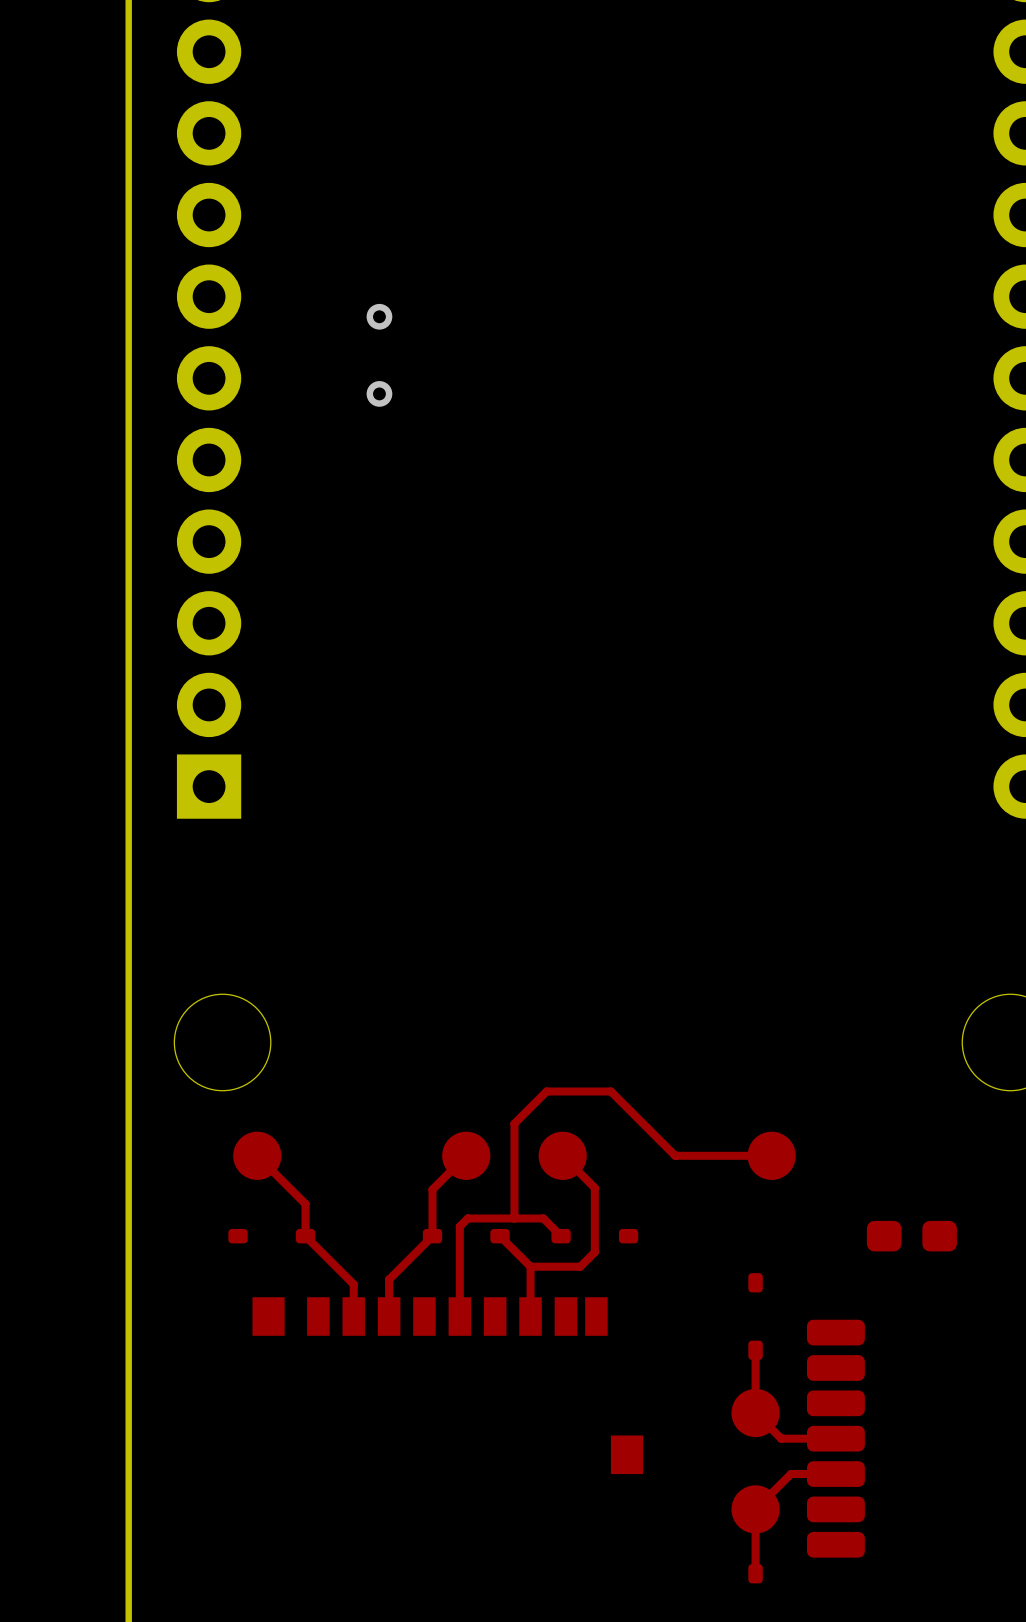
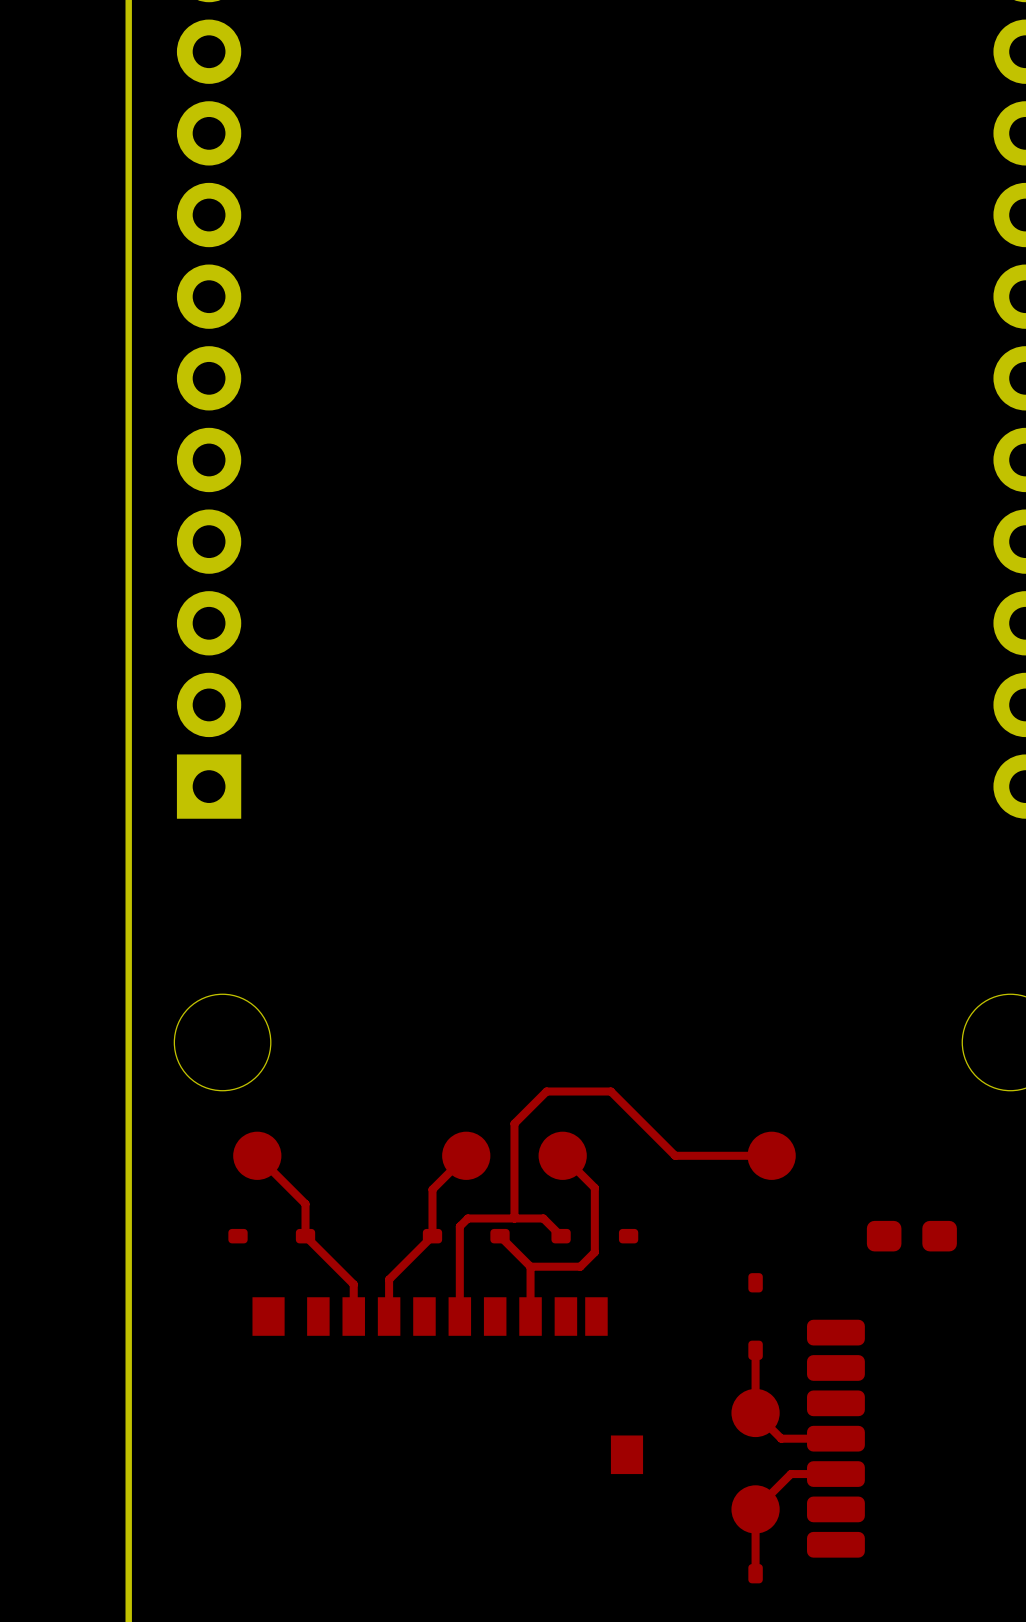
via: (379, 316) -> none
via: (379, 393) -> none

